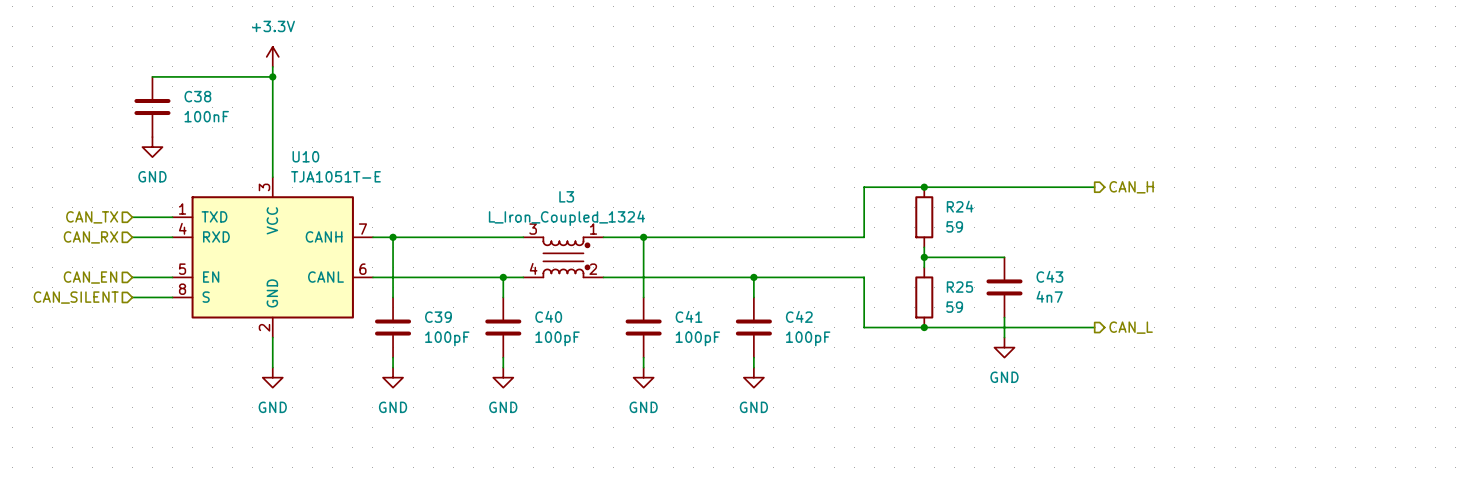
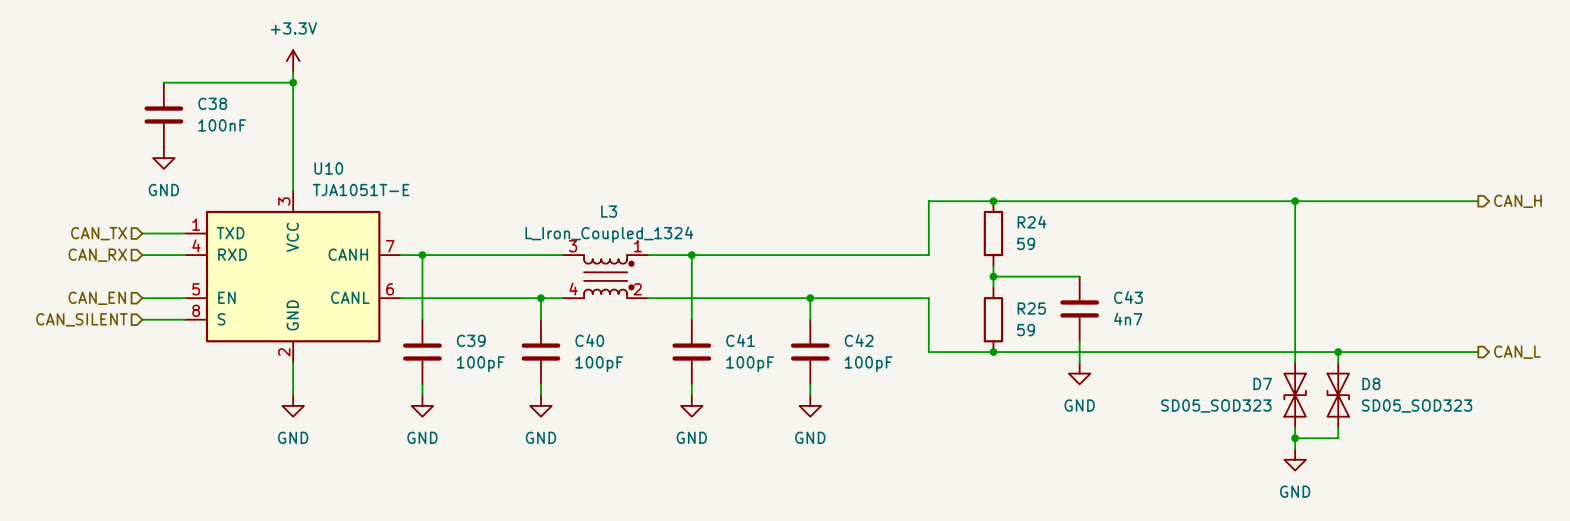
wire: none -> (1176, 201) (1478, 201)
hierarchical label: CAN_H (1131, 187) -> none
wire: none -> (1295, 201) (1295, 362)
junction: none -> (1295, 201)
hierarchical label: none -> CAN_H (1517, 201)
wire: none -> (1176, 352) (1478, 352)
hierarchical label: CAN_L (1131, 327) -> none
wire: none -> (1338, 352) (1338, 362)
junction: none -> (1338, 352)
hierarchical label: none -> CAN_L (1517, 352)
D7: none -> SD05_SOD323 (1295, 395)
D8: none -> SD05_SOD323 (1338, 395)
wire: none -> (1295, 427) (1295, 449)
wire: none -> (1338, 427) (1338, 438) (1295, 438)
junction: none -> (1295, 438)
power symbol: none -> GND (1295, 459)

